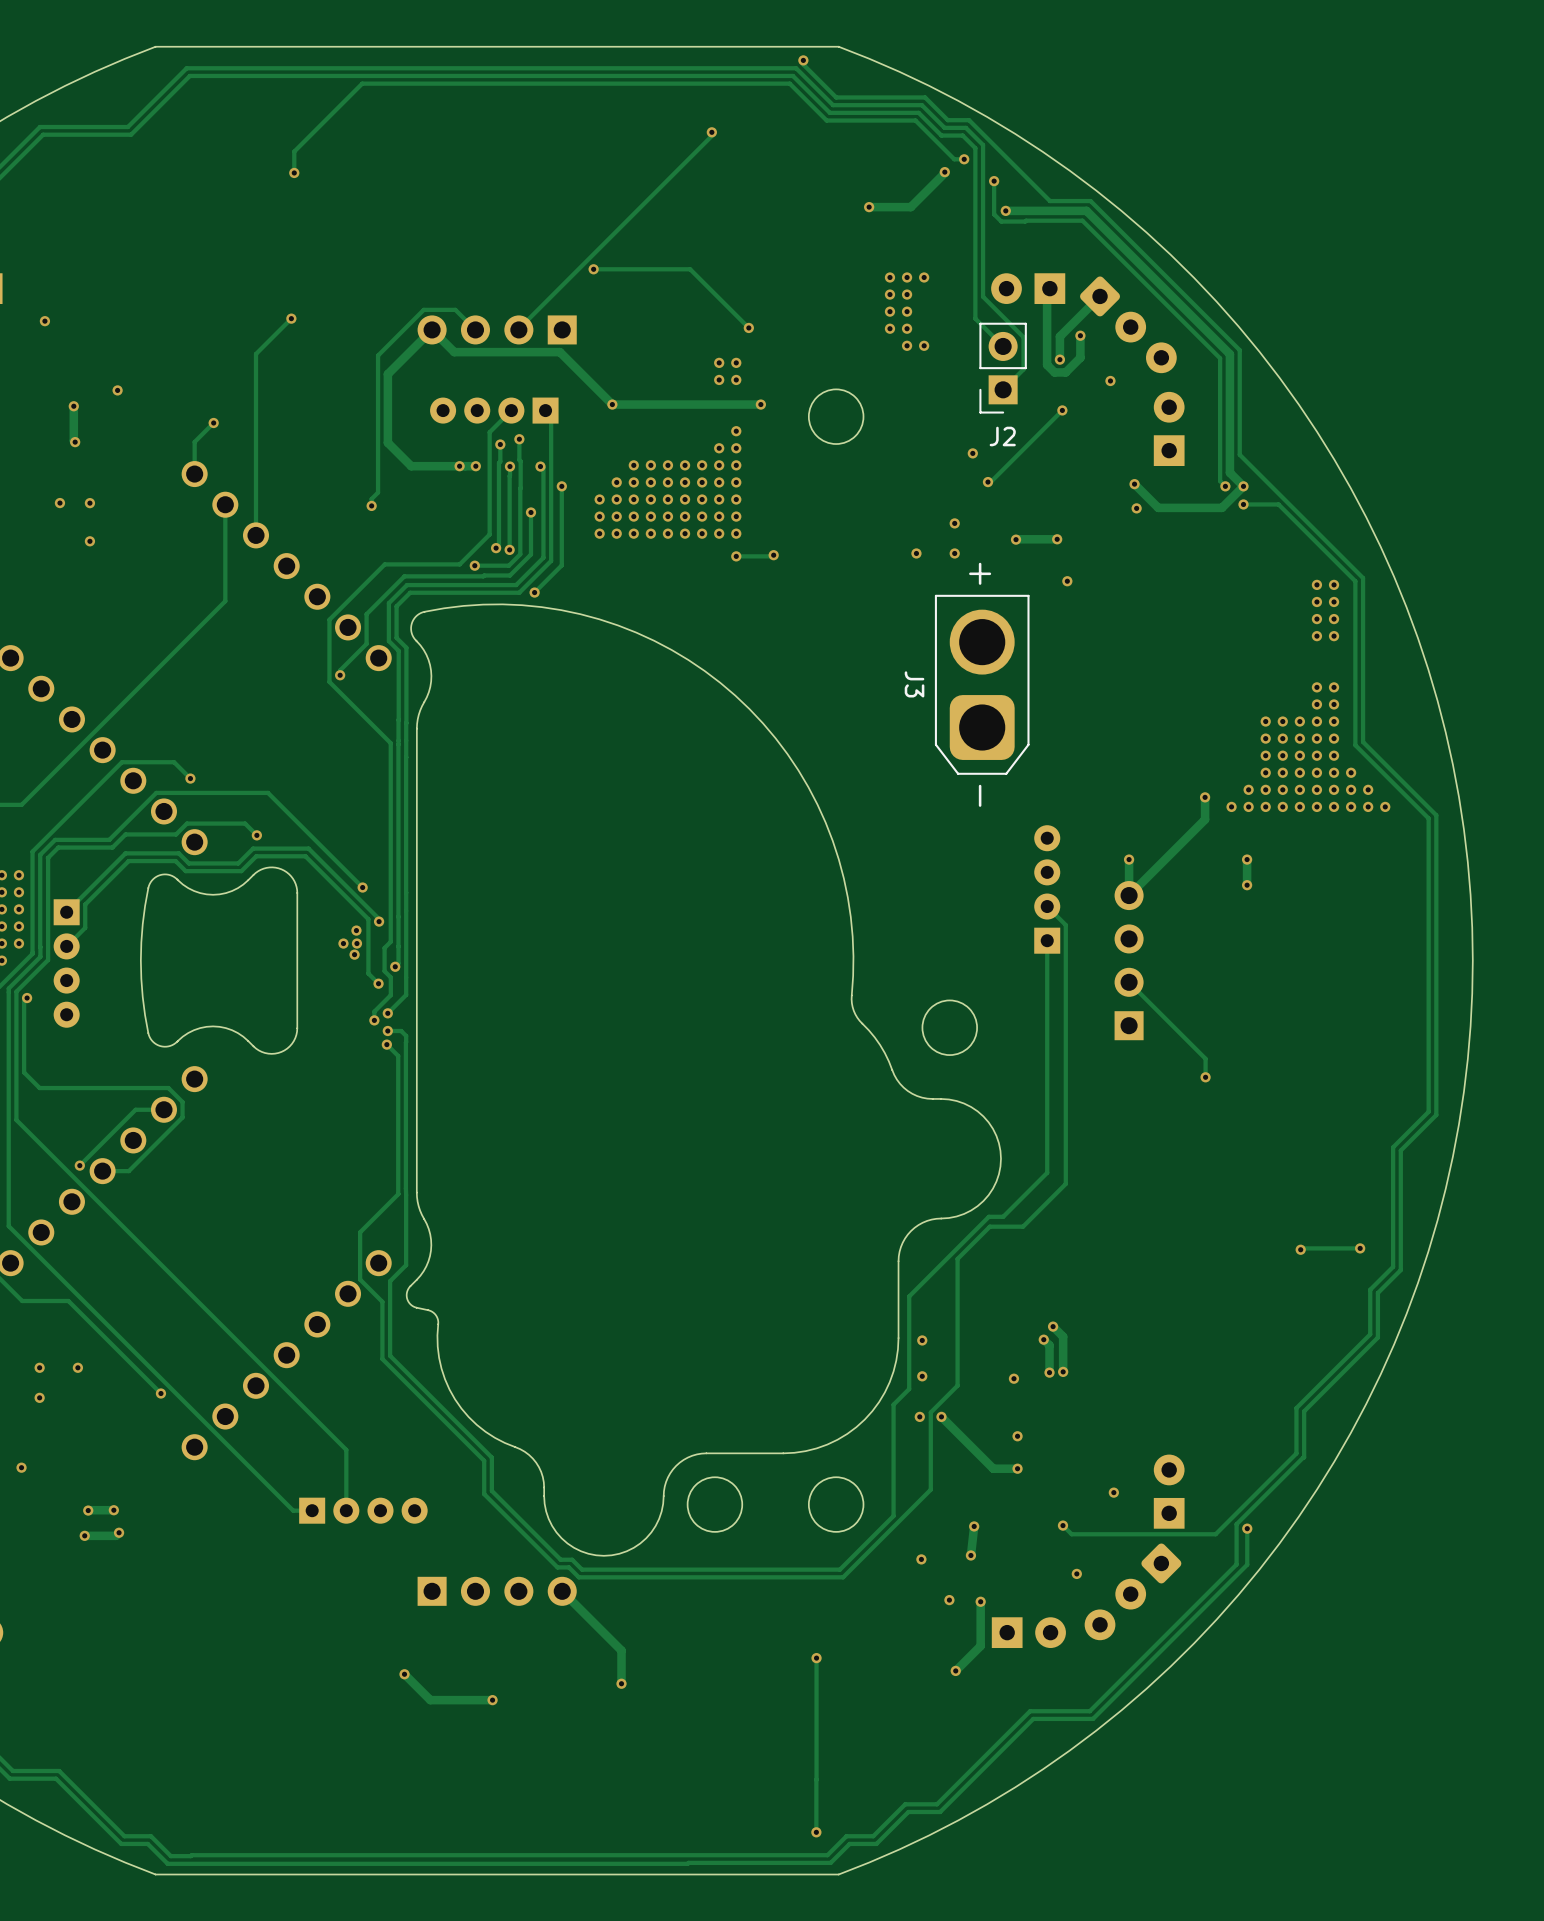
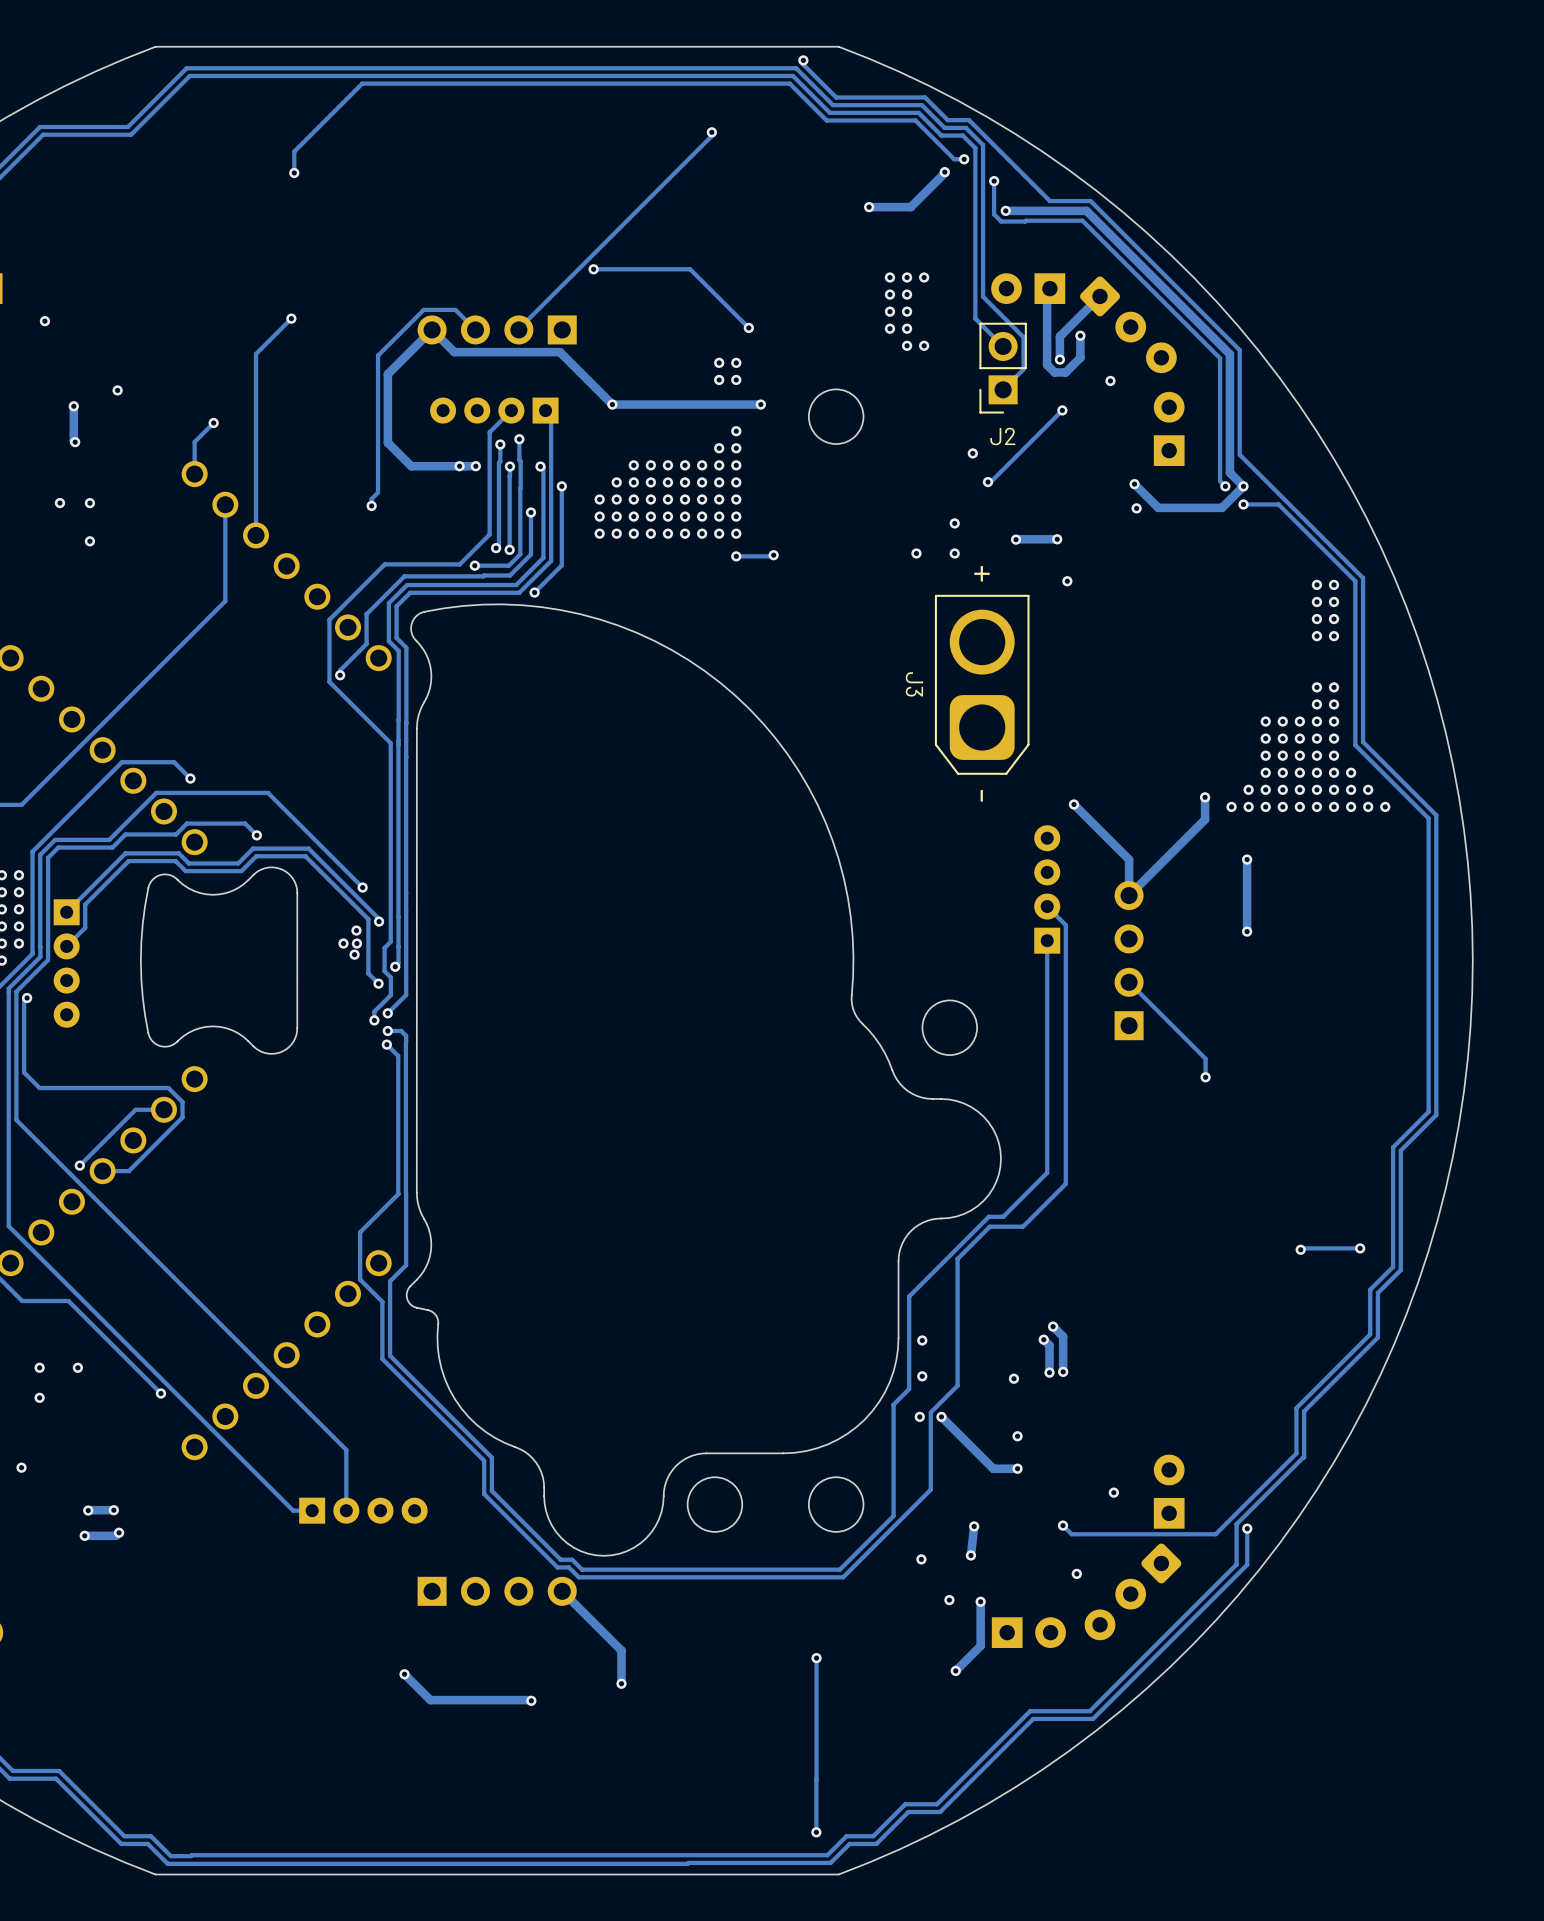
track: none -> (1073, 804) (1129, 859)
via: none -> (1073, 804)
via: (1129, 859) -> none
track: none -> (1247, 885) (1247, 931)
via position: (1247, 885) -> (1247, 931)
track: none -> (492, 1700) (531, 1700)
via position: (492, 1700) -> (531, 1700)

